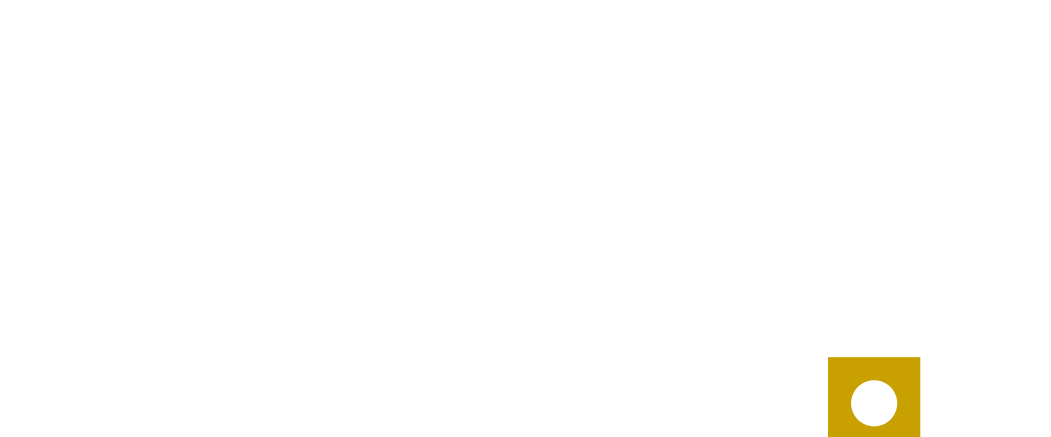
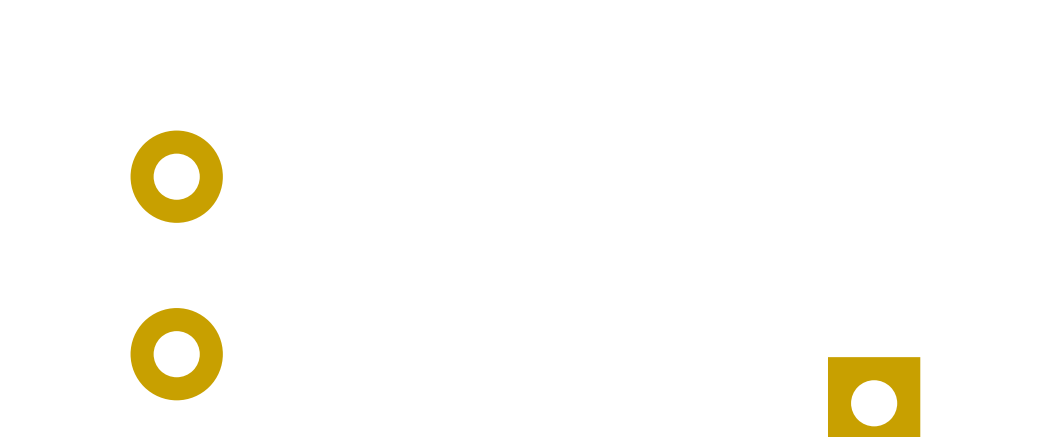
part: none -> (176, 265)

